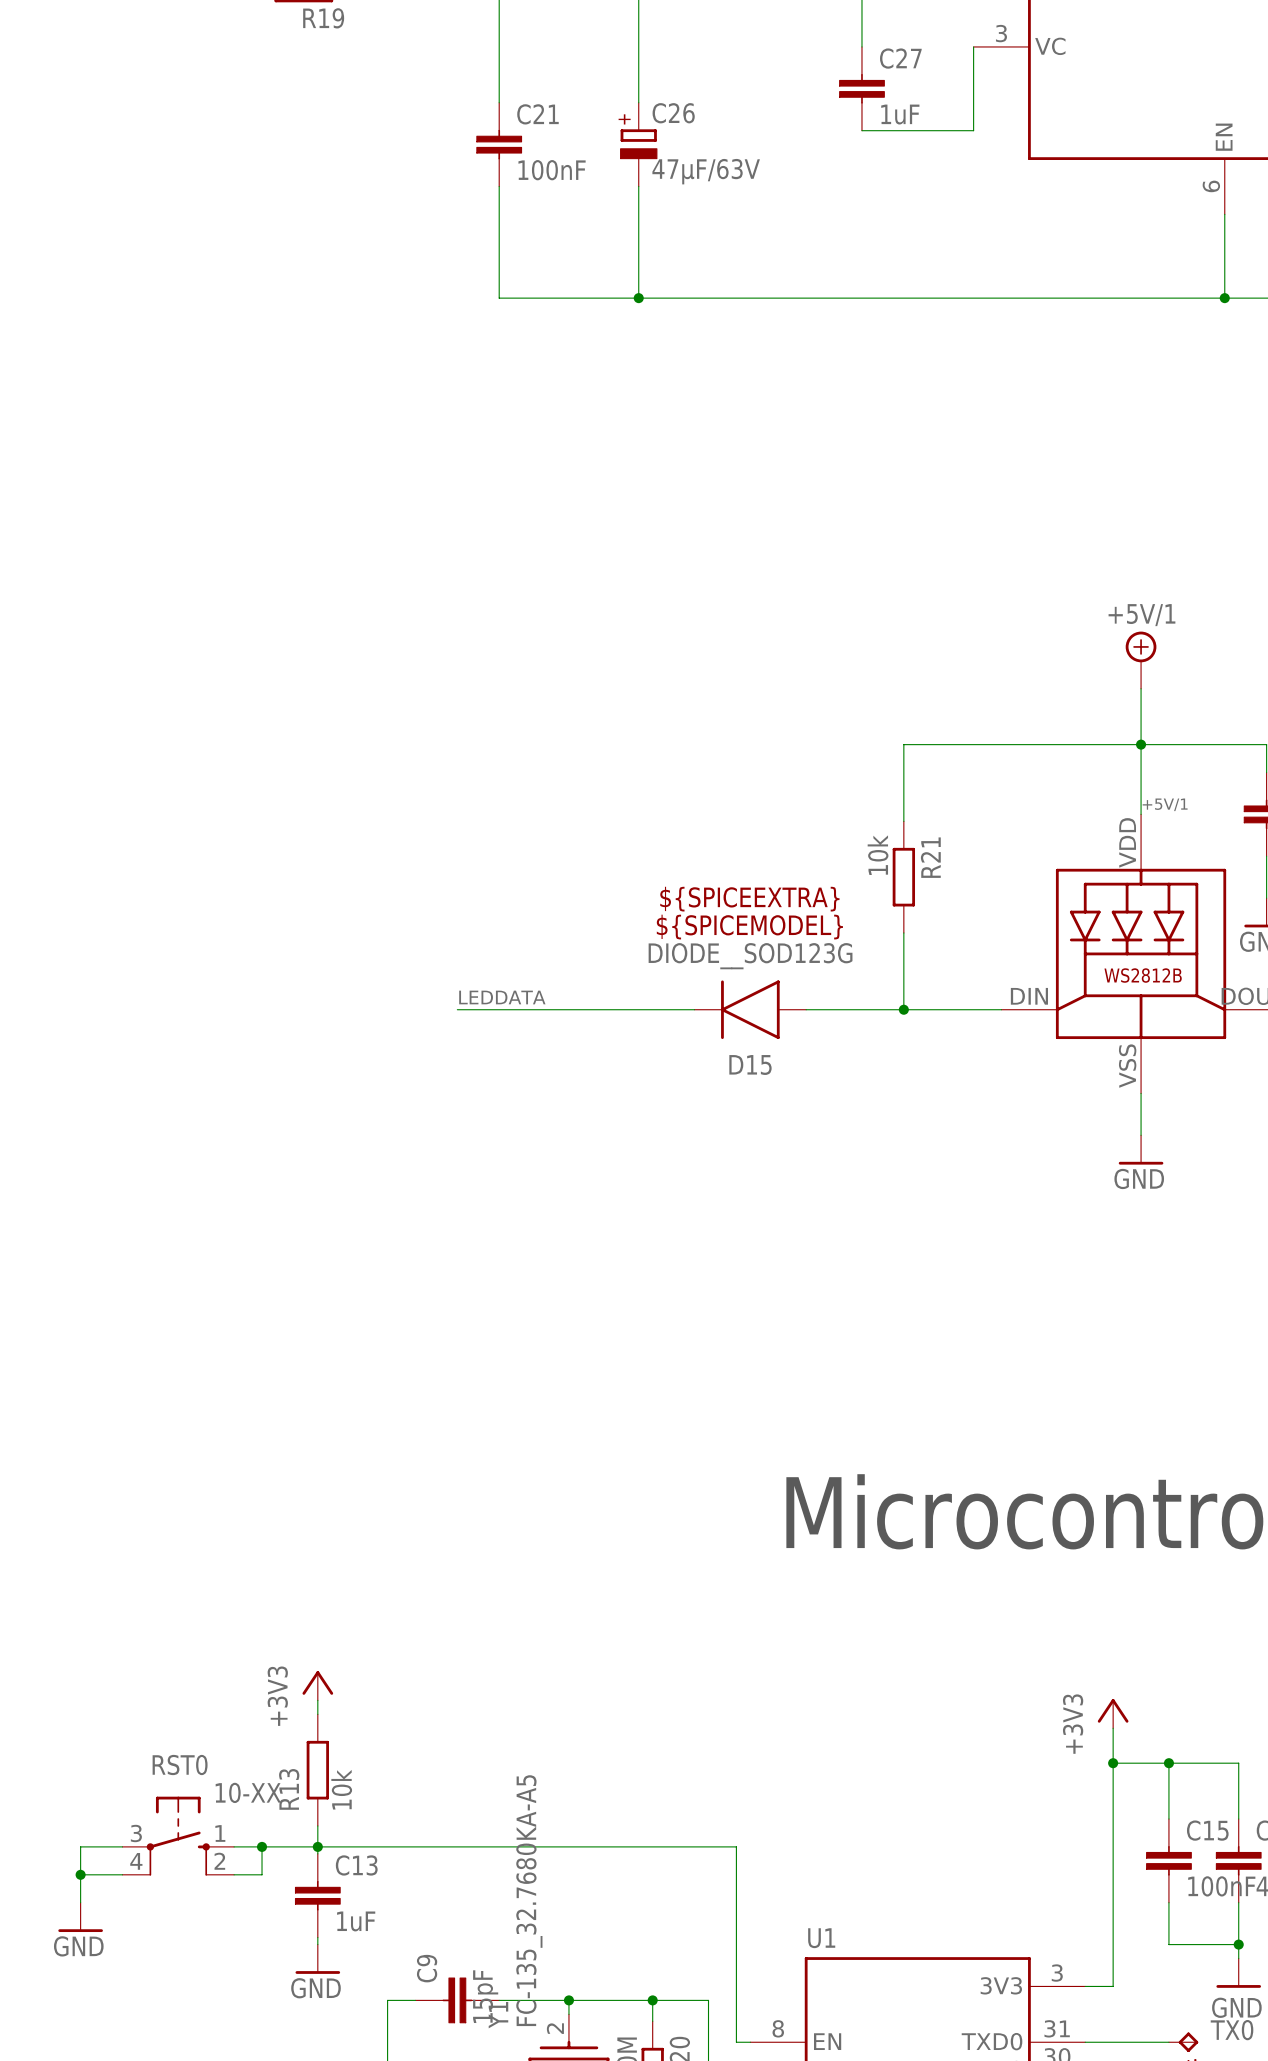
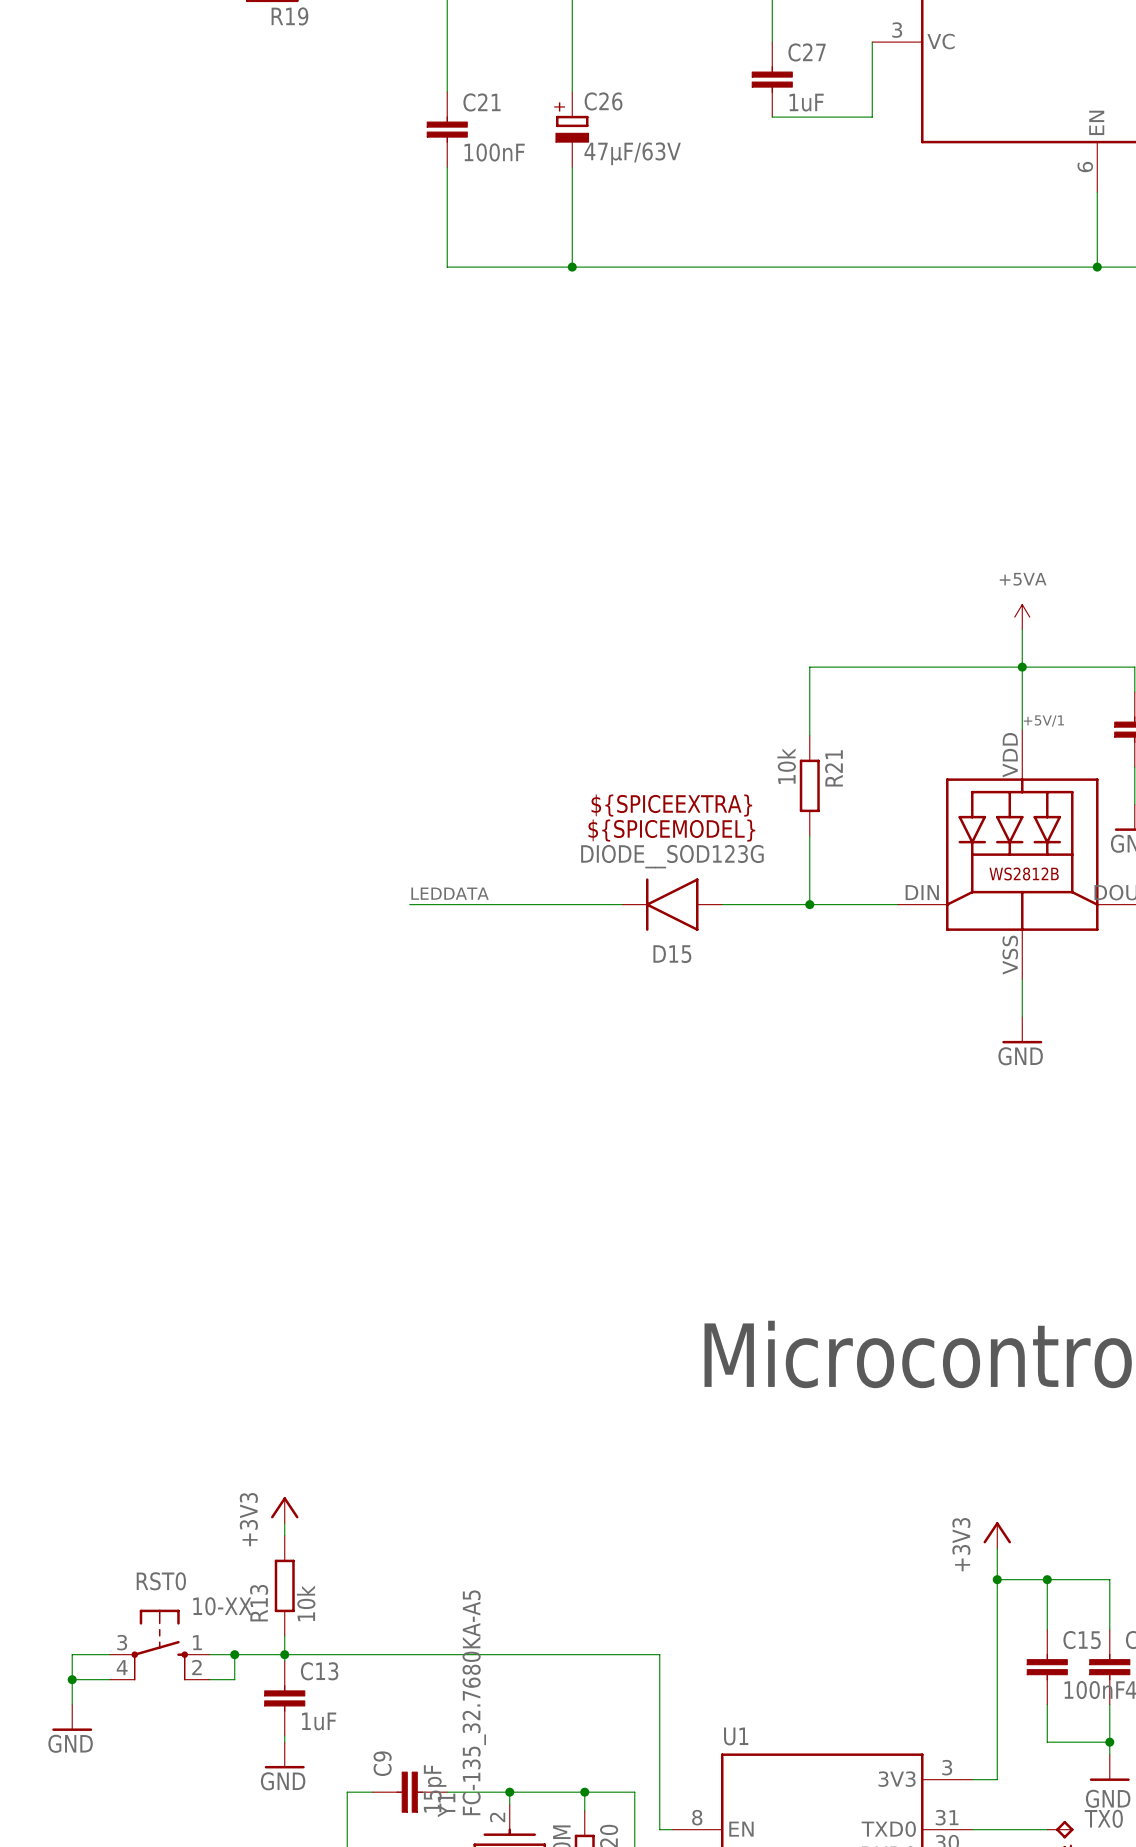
power symbol: +5V/1 (1141, 660) -> none
power symbol: none -> +5VA (1022, 617)

